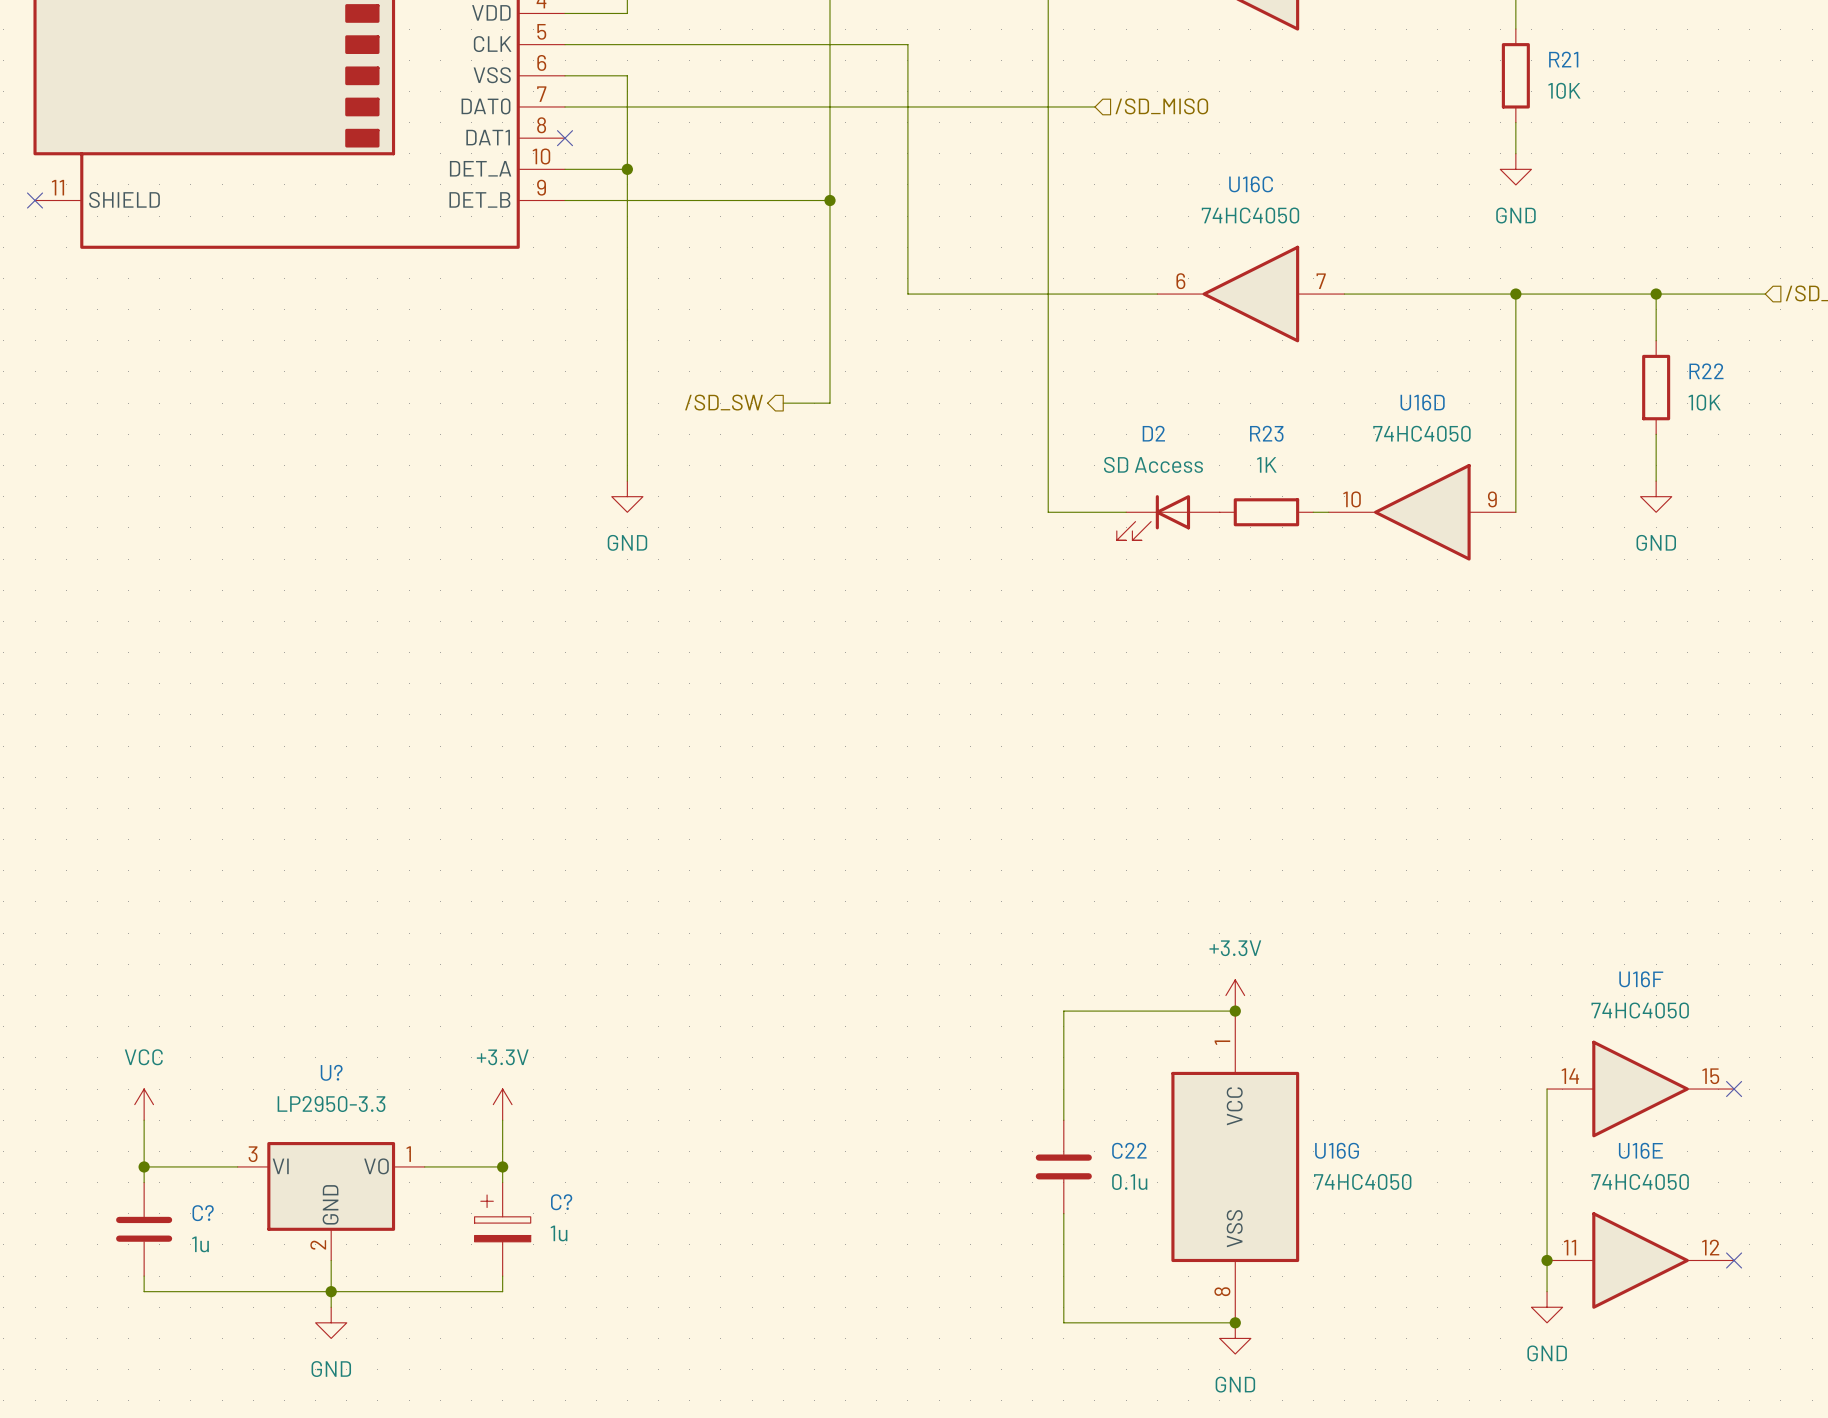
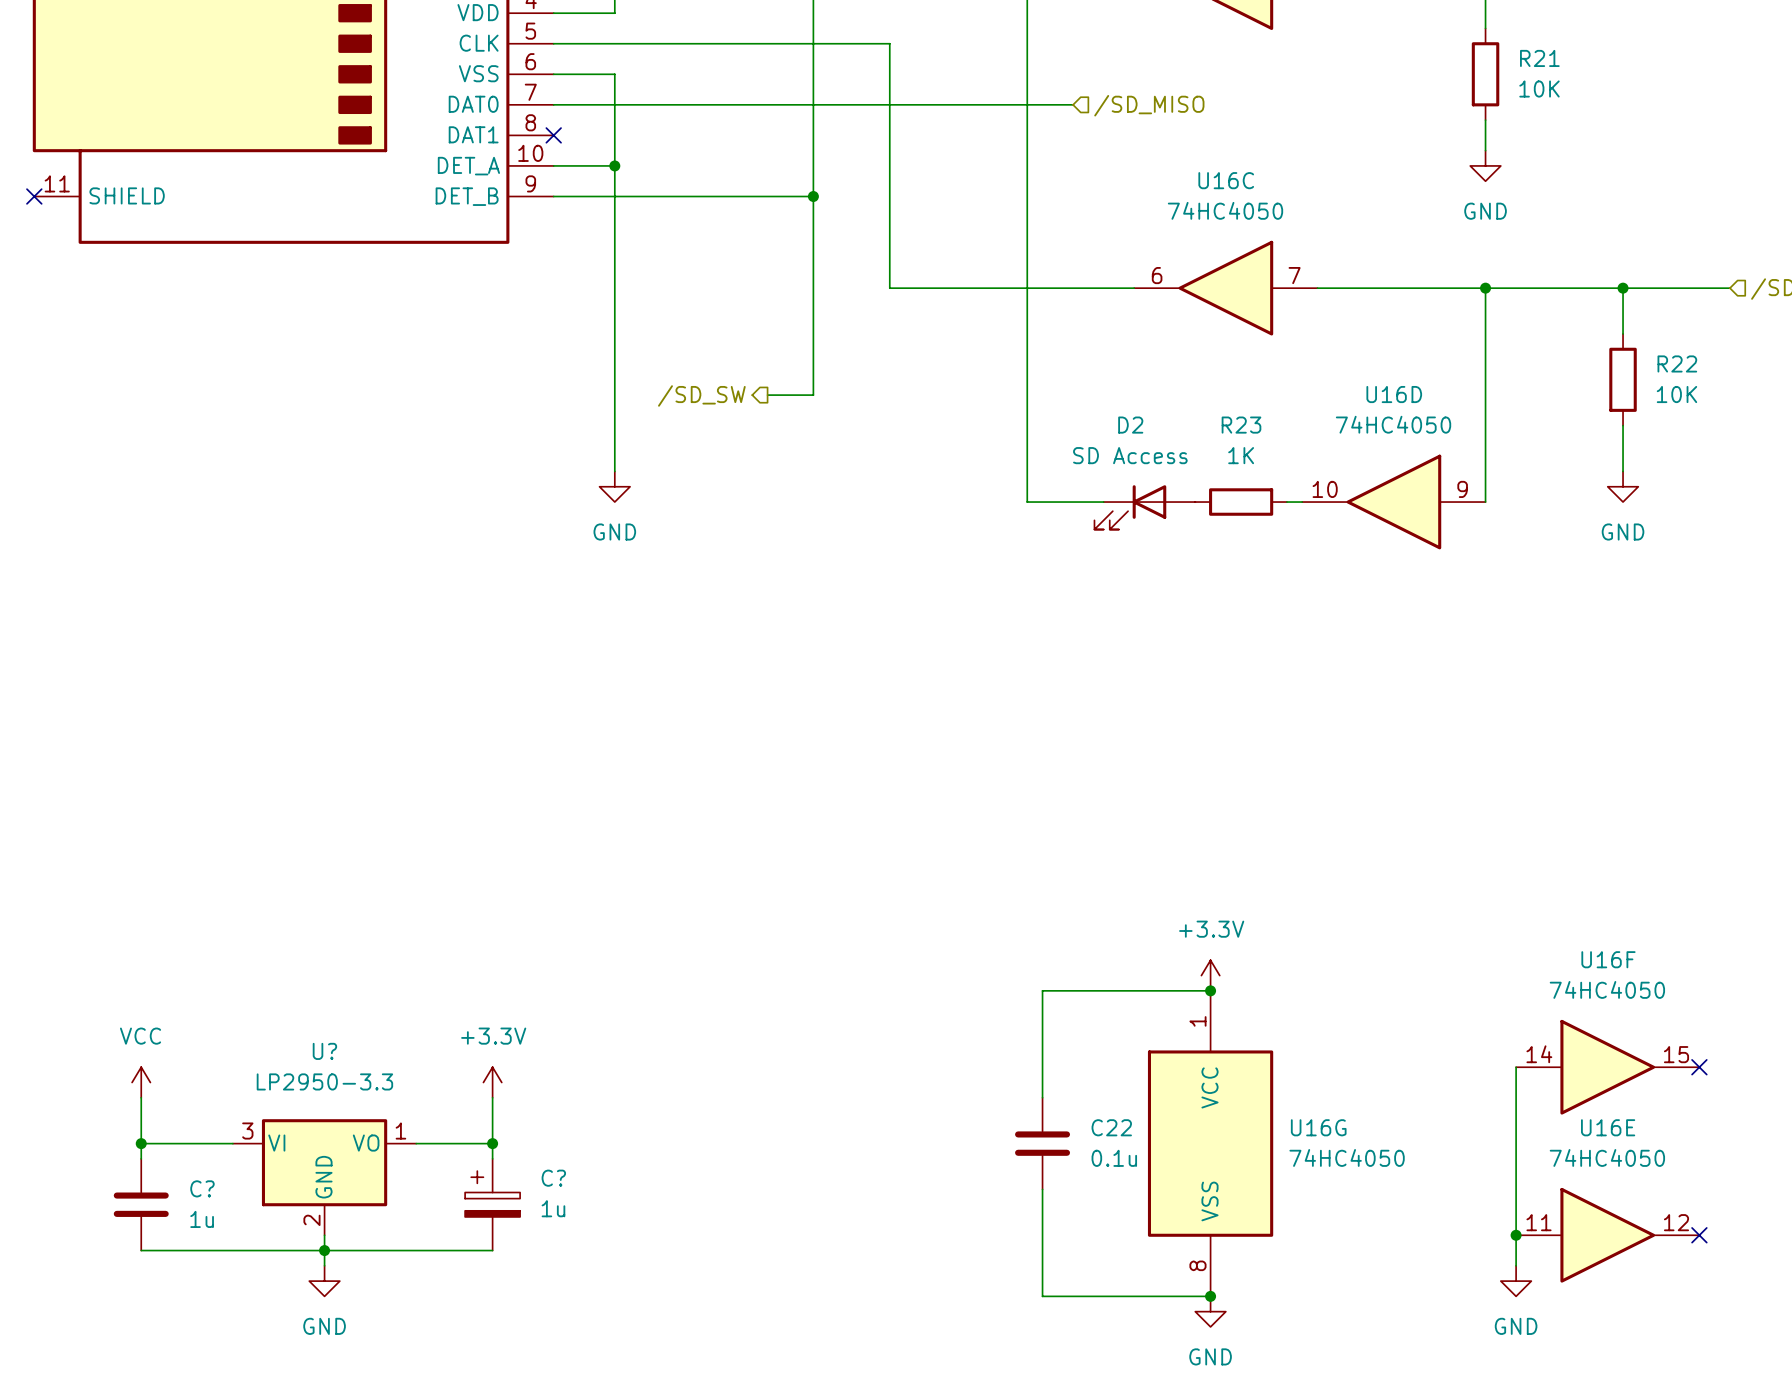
wire: (144, 1276) (144, 1291) (502, 1291) (502, 1276) -> (141, 1250) (492, 1250)
junction position: (331, 1291) -> (324, 1250)
power symbol position: GND (331, 1322) -> GND (324, 1281)

